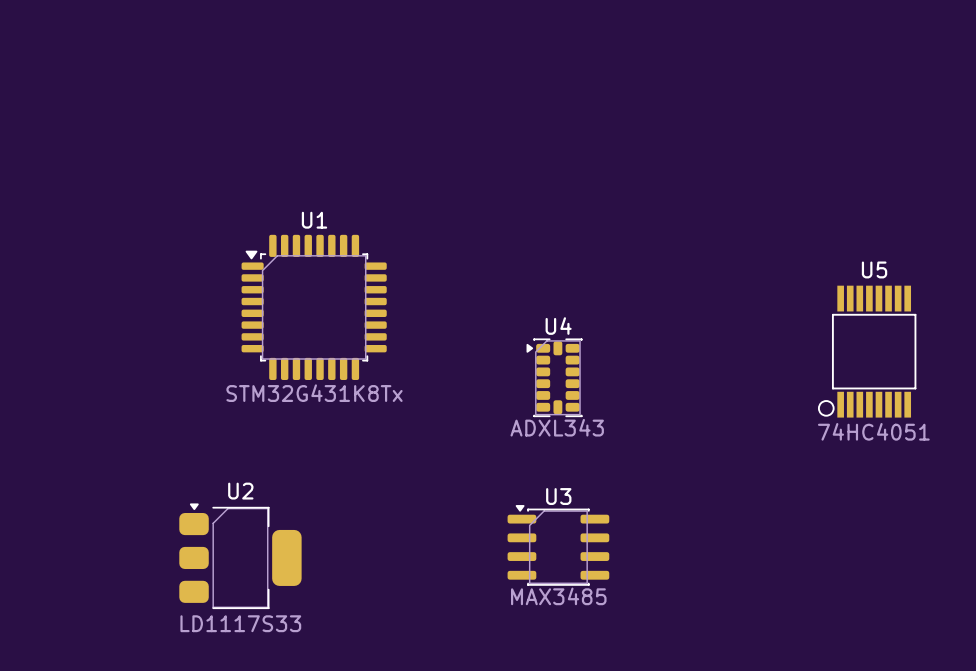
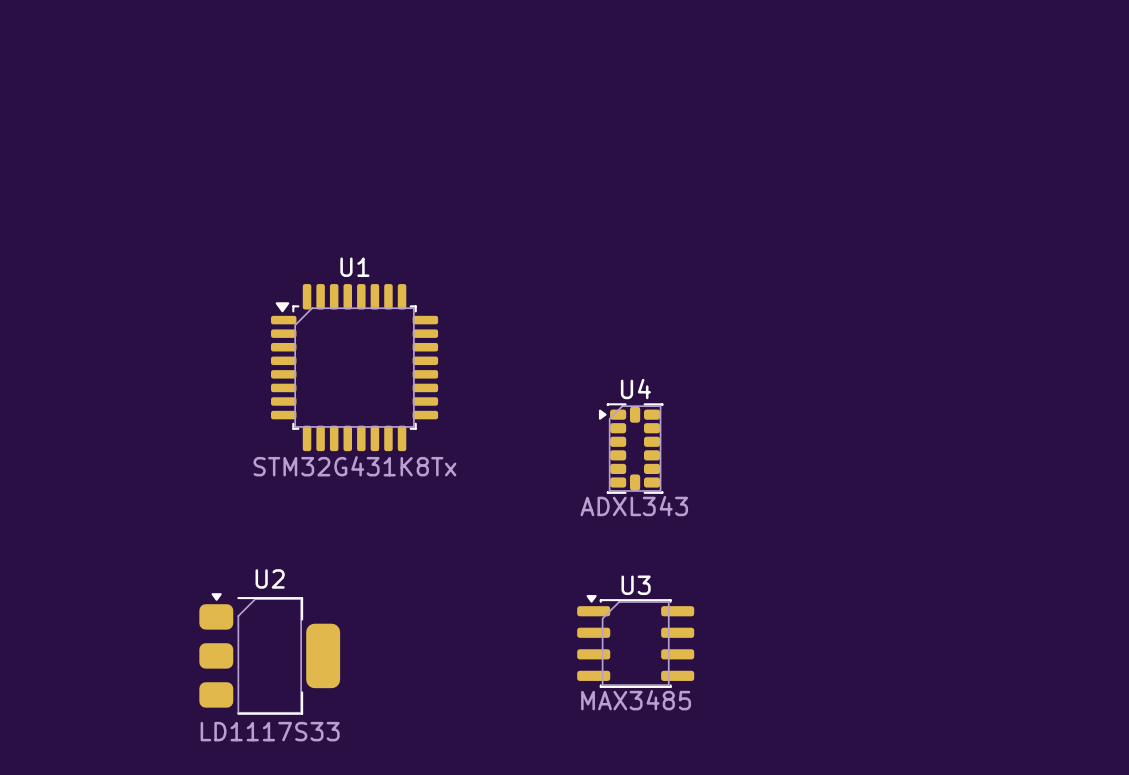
U5: 74HC4051 (867, 351) -> none

